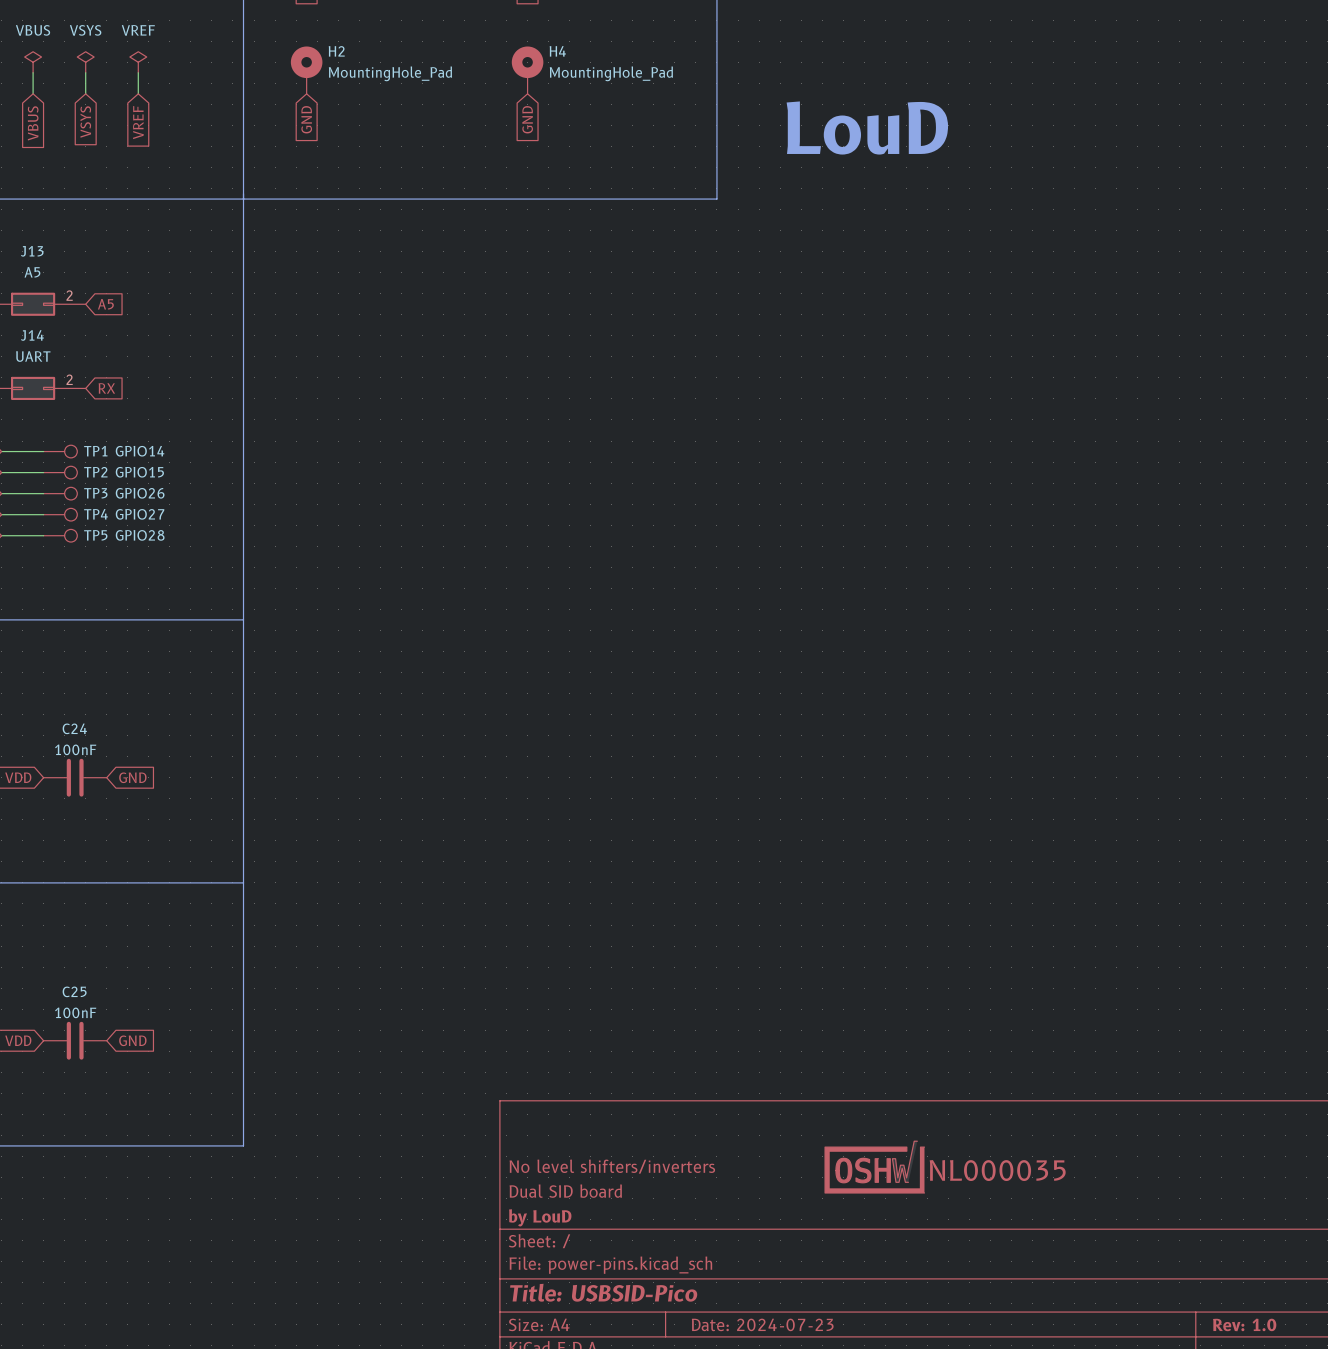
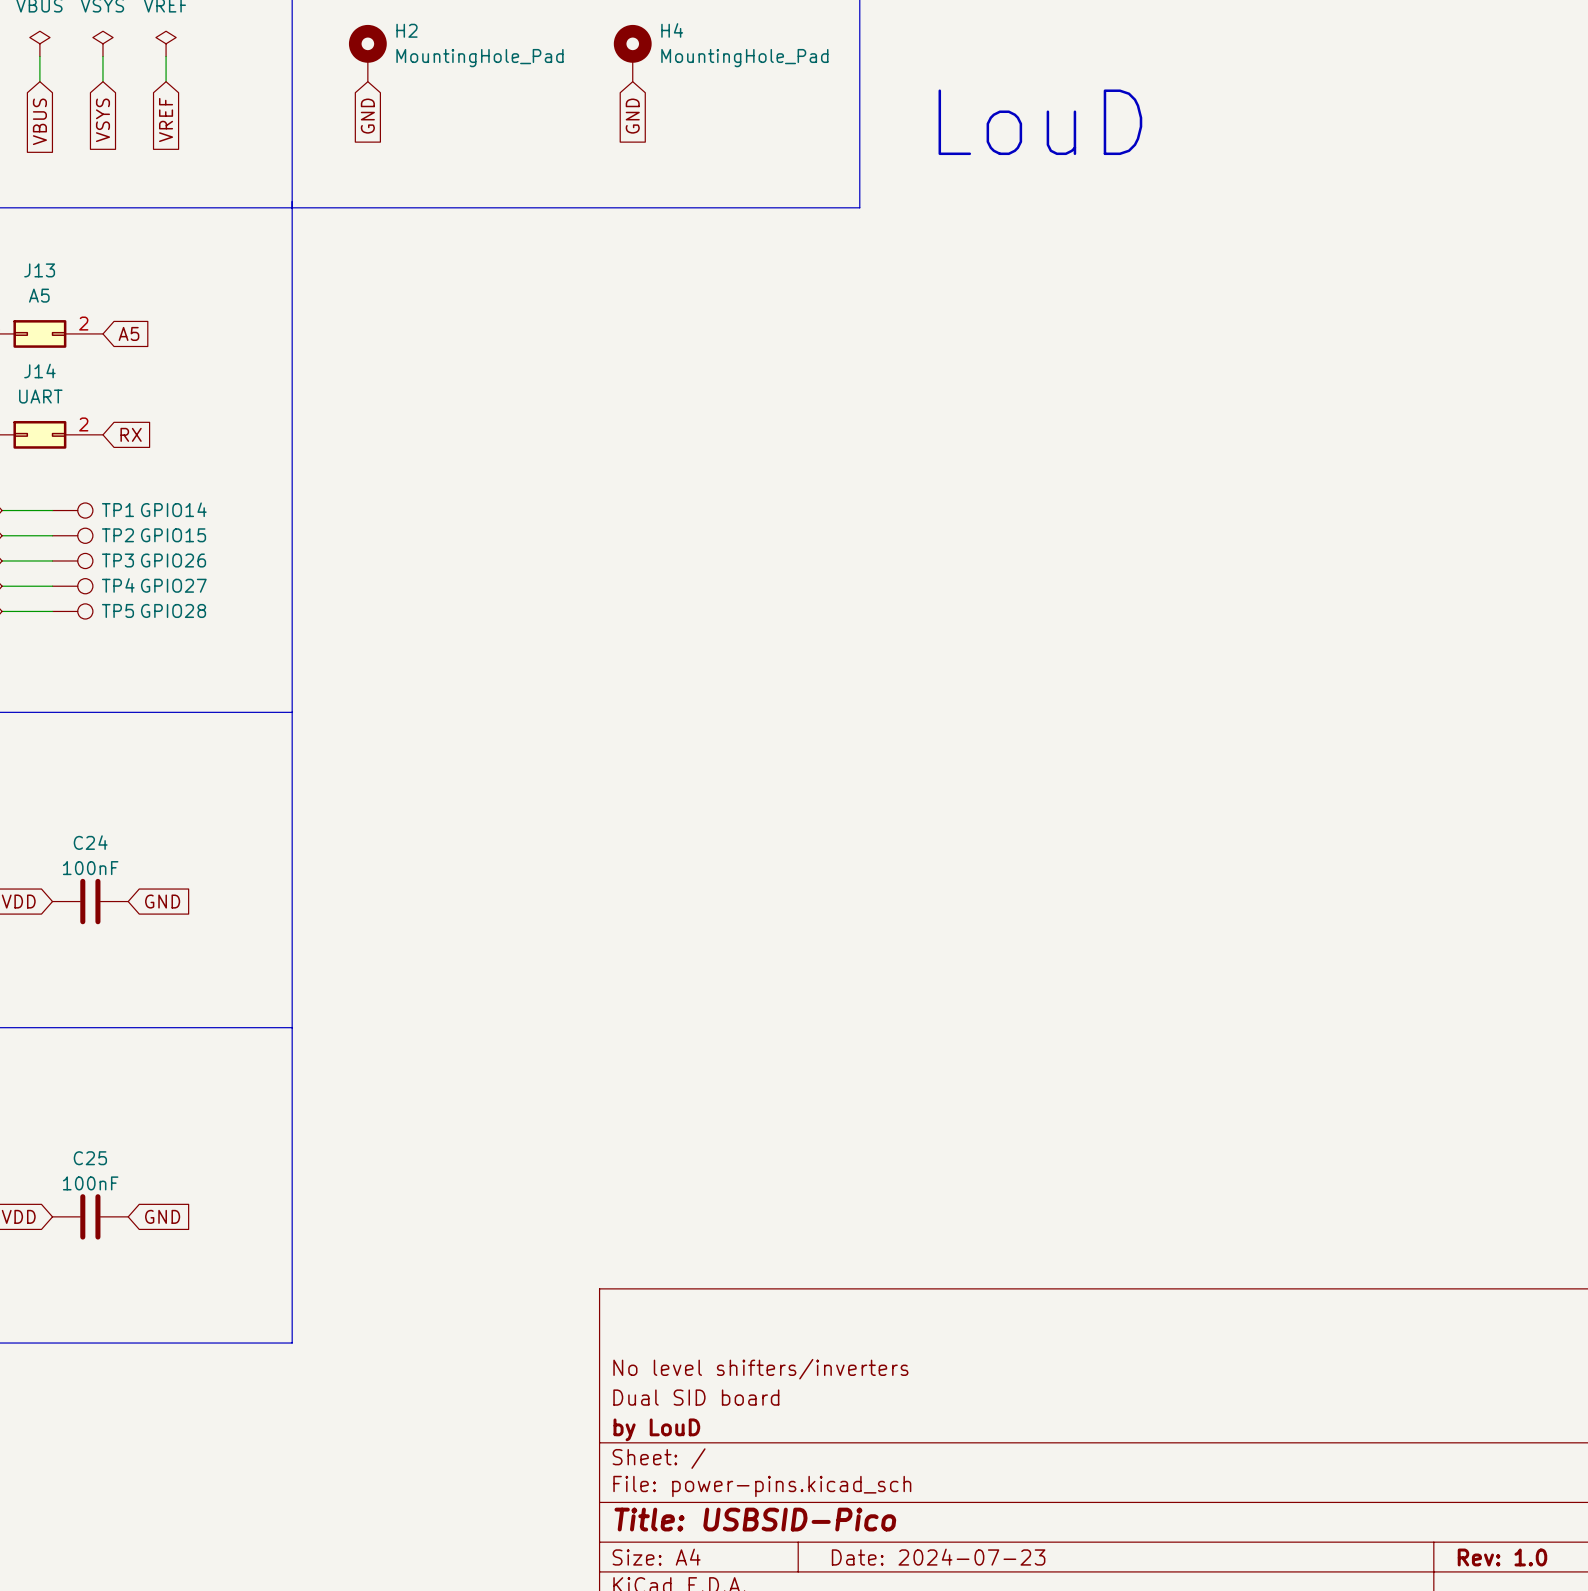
part: (874, 1167) -> none

